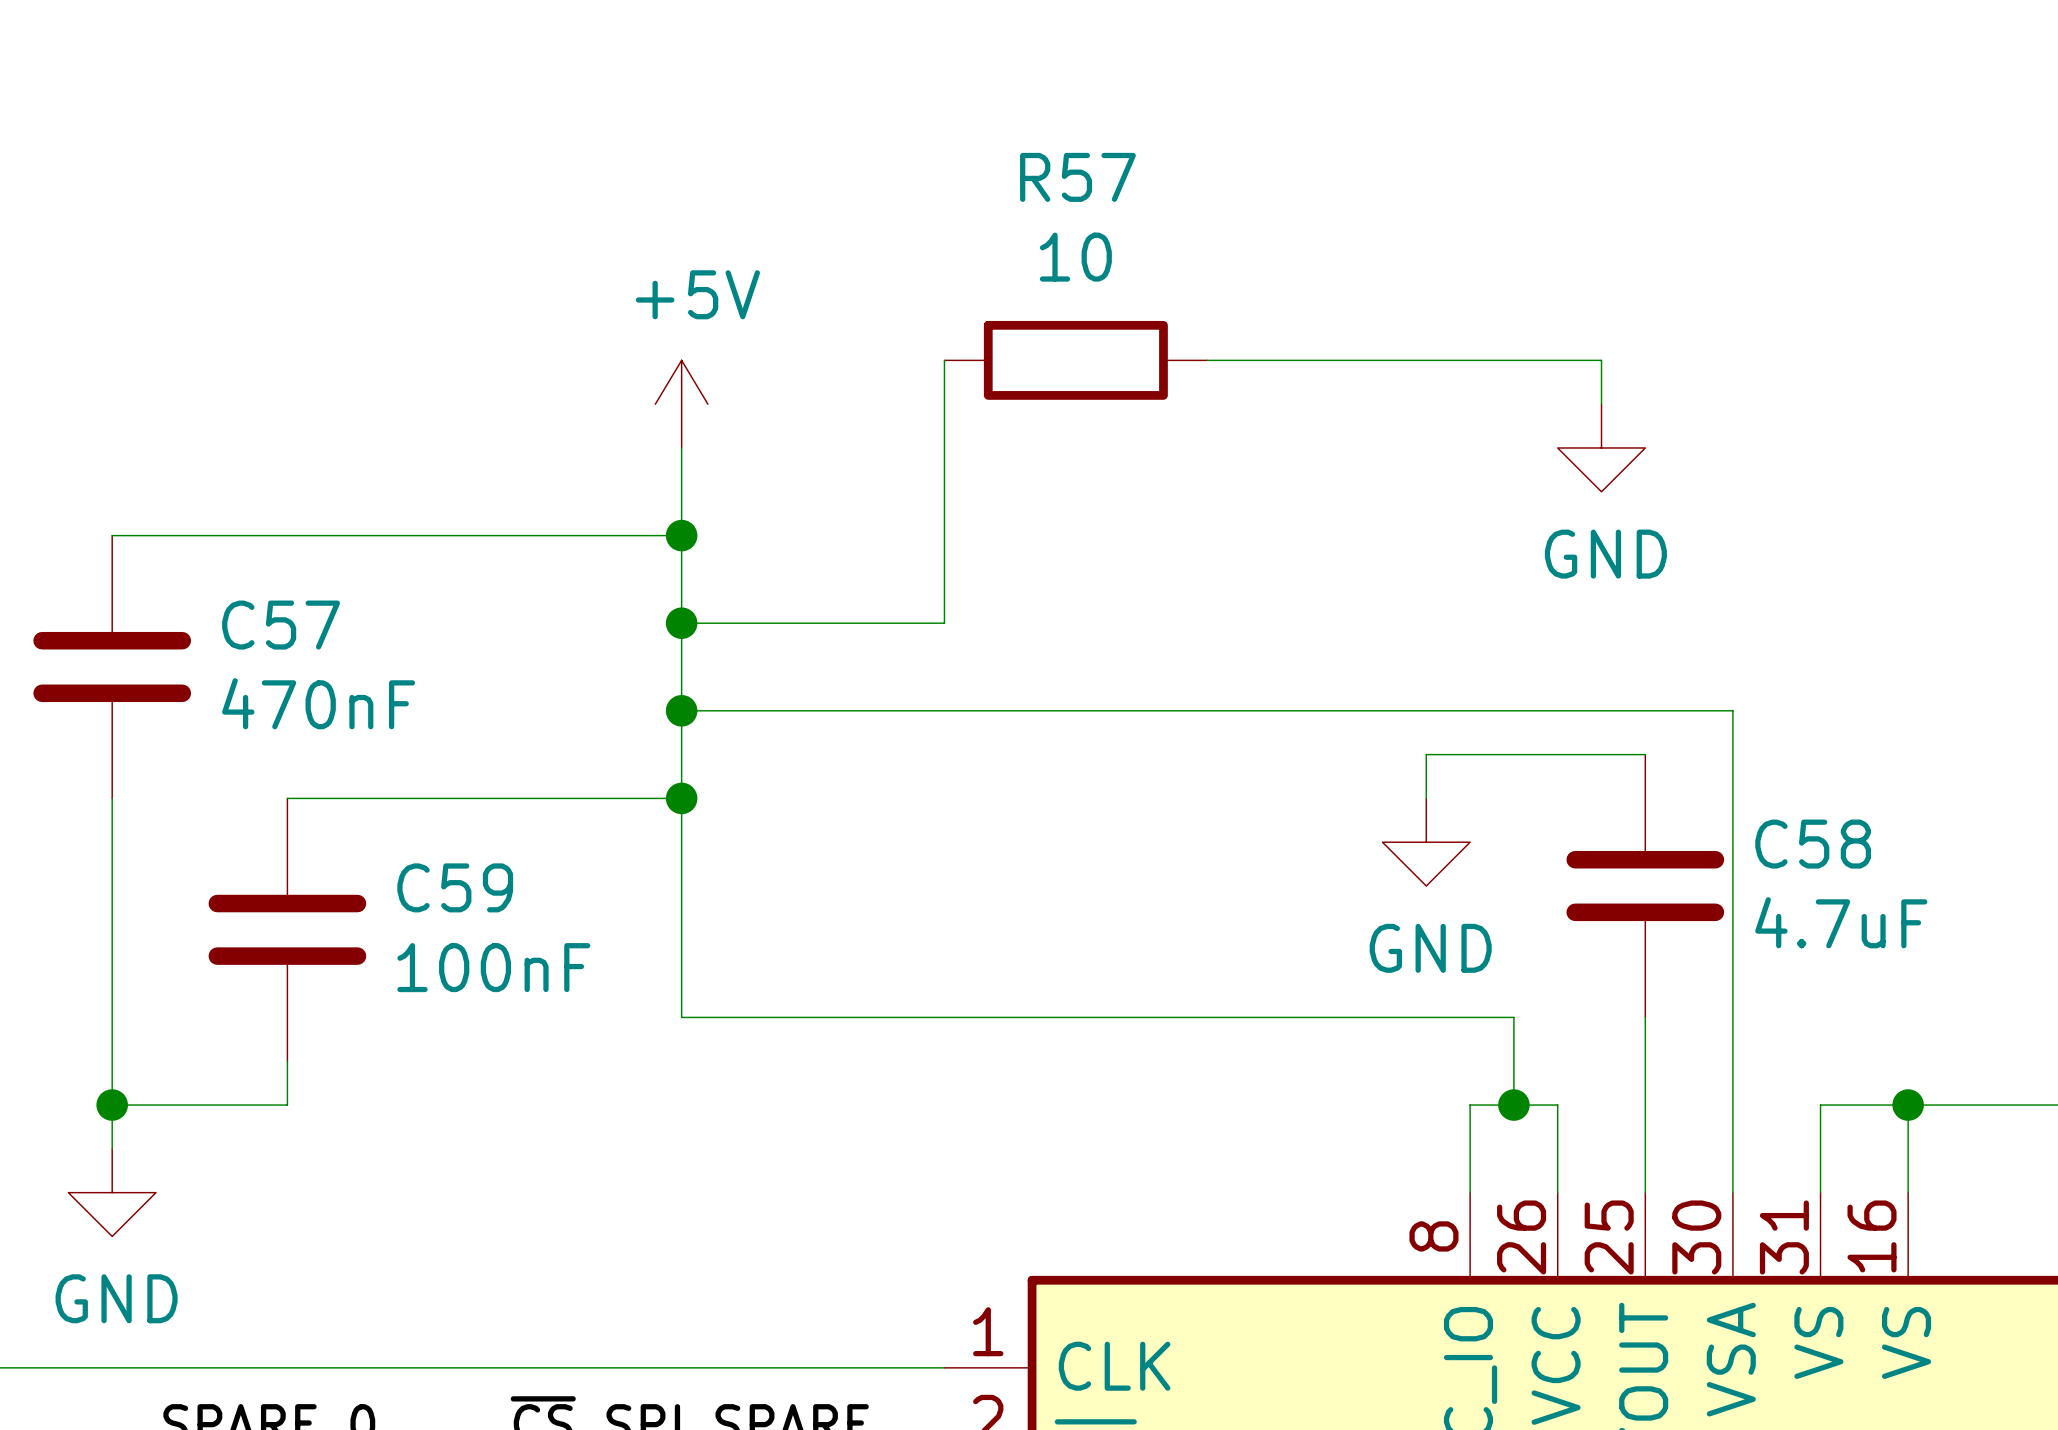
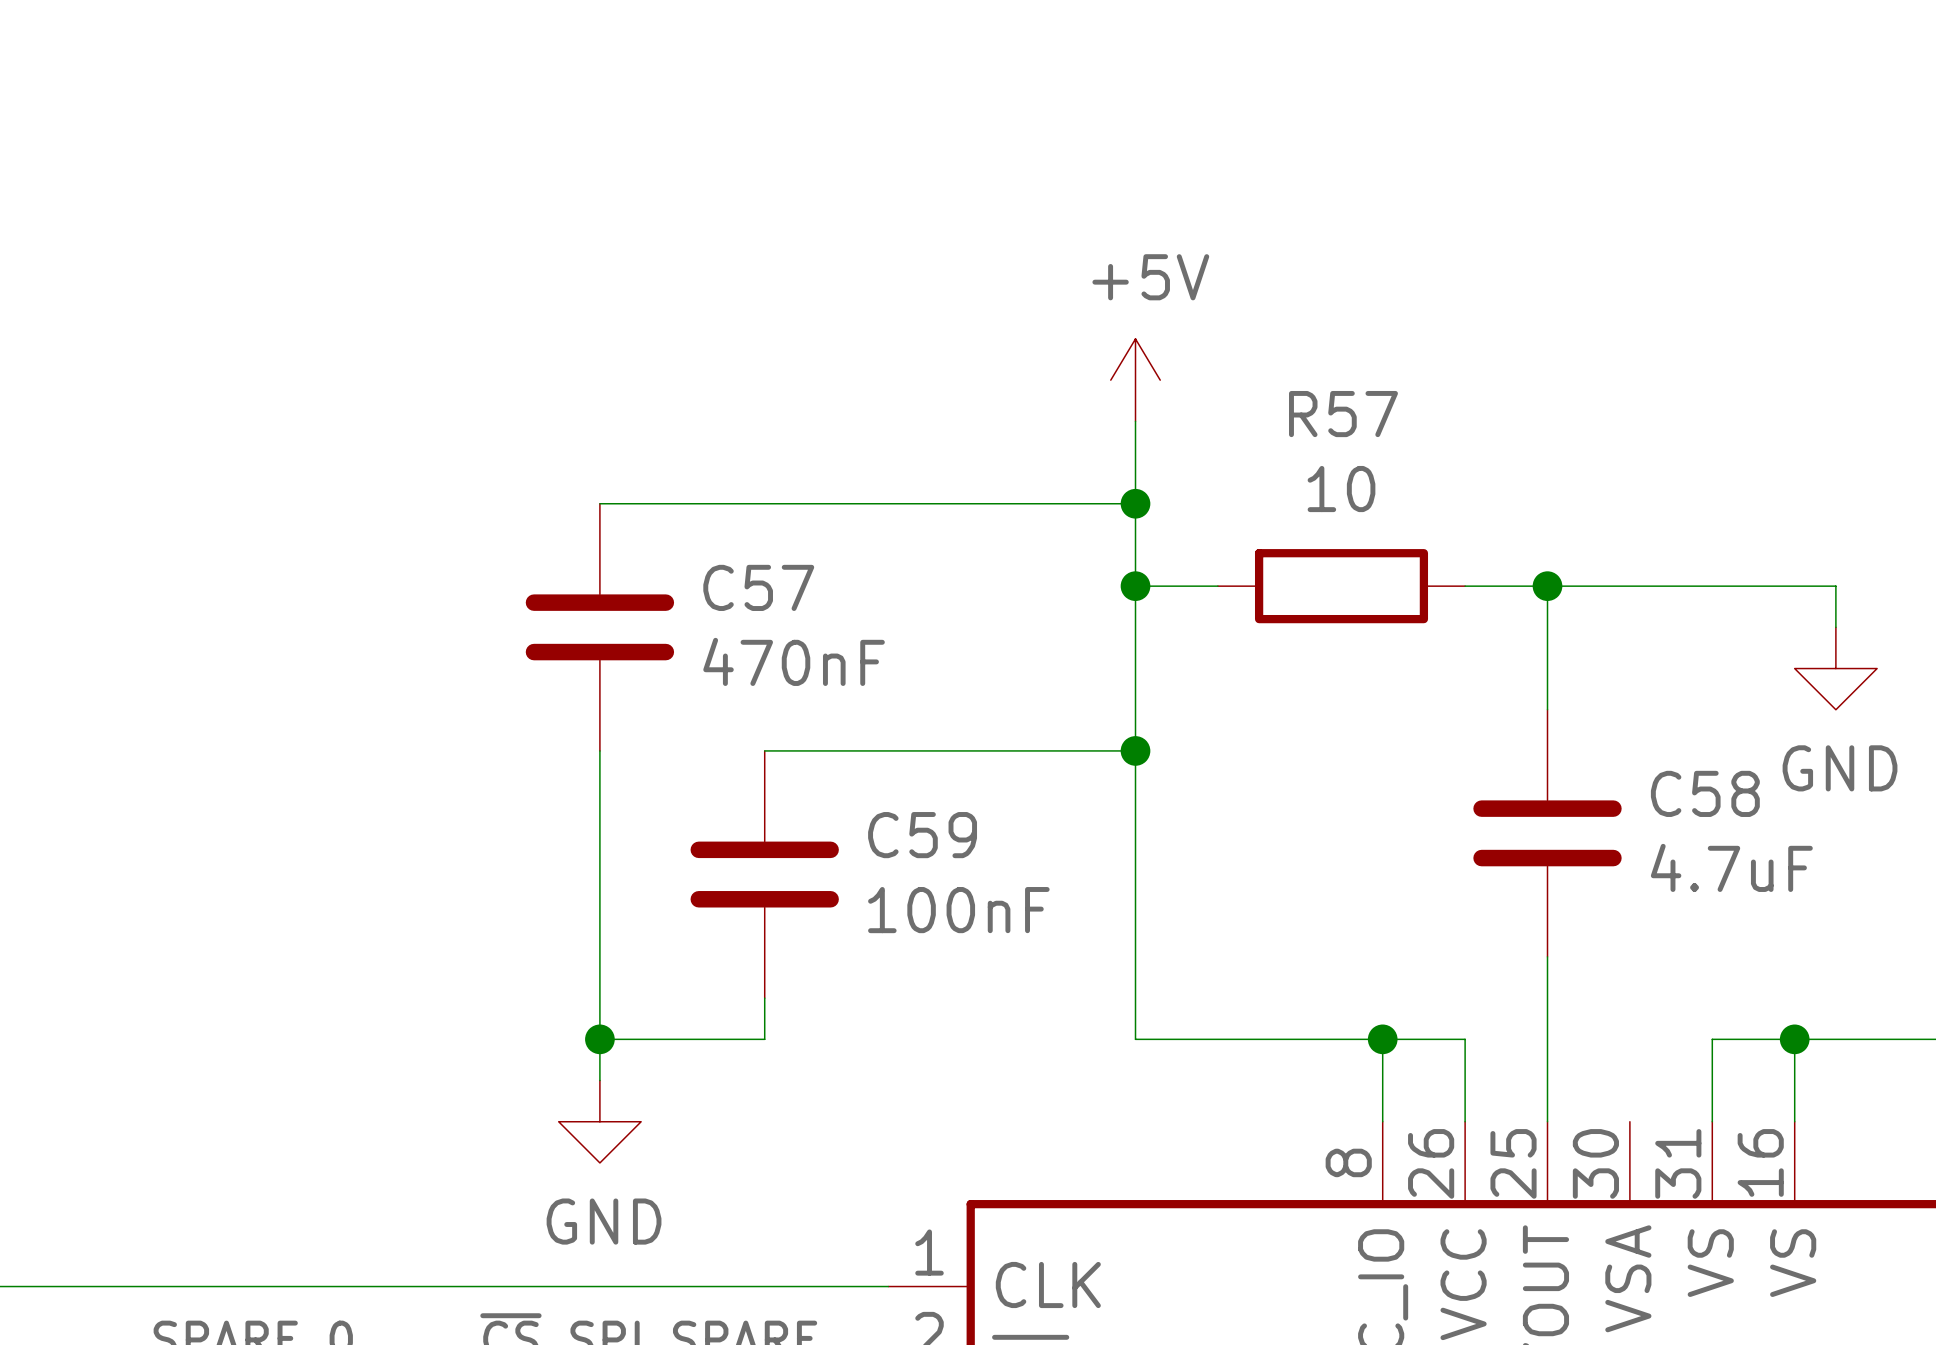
wire: (944, 360) (944, 623) (681, 623) -> none
R57 position: (1075, 360) -> (1341, 586)
wire: (1207, 360) (1601, 360) (1601, 404) -> (1465, 586) (1835, 586) (1835, 627)
power symbol position: +5V (681, 404) -> +5V (1135, 380)
wire: (681, 447) (681, 1017) (1513, 1017) (1513, 1105) -> none
wire: none -> (1135, 421) (1135, 1039) (1382, 1039)
power symbol: GND (1601, 447) -> none
wire: (112, 535) (637, 535) -> (641, 503) (1135, 503)
junction: (681, 535) -> none
junction: none -> (1135, 503)
junction: (681, 623) -> none
wire: none -> (1135, 586) (1217, 586)
junction: none -> (1135, 586)
junction: none -> (1547, 586)
C57 position: (112, 667) -> (599, 627)
wire: (681, 710) (1732, 710) (1732, 1192) -> none
junction: (681, 710) -> none
power symbol: none -> GND (1835, 668)
wire: (1645, 754) (1426, 754) (1426, 798) -> (1547, 709) (1547, 586)
wire: (112, 798) (112, 1148) -> (599, 750) (599, 1080)
wire: (287, 798) (681, 798) -> (764, 750) (1135, 750)
junction: (681, 798) -> none
junction: none -> (1135, 750)
power symbol: GND (1426, 842) -> none
C59 position: (287, 929) -> (764, 874)
wire: (287, 1061) (287, 1105) (112, 1105) -> (764, 998) (764, 1039) (599, 1039)
junction: (112, 1105) -> none
junction: none -> (599, 1039)
junction position: (1513, 1105) -> (1382, 1039)
power symbol: GND (112, 1192) -> none
power symbol: none -> GND (599, 1121)

